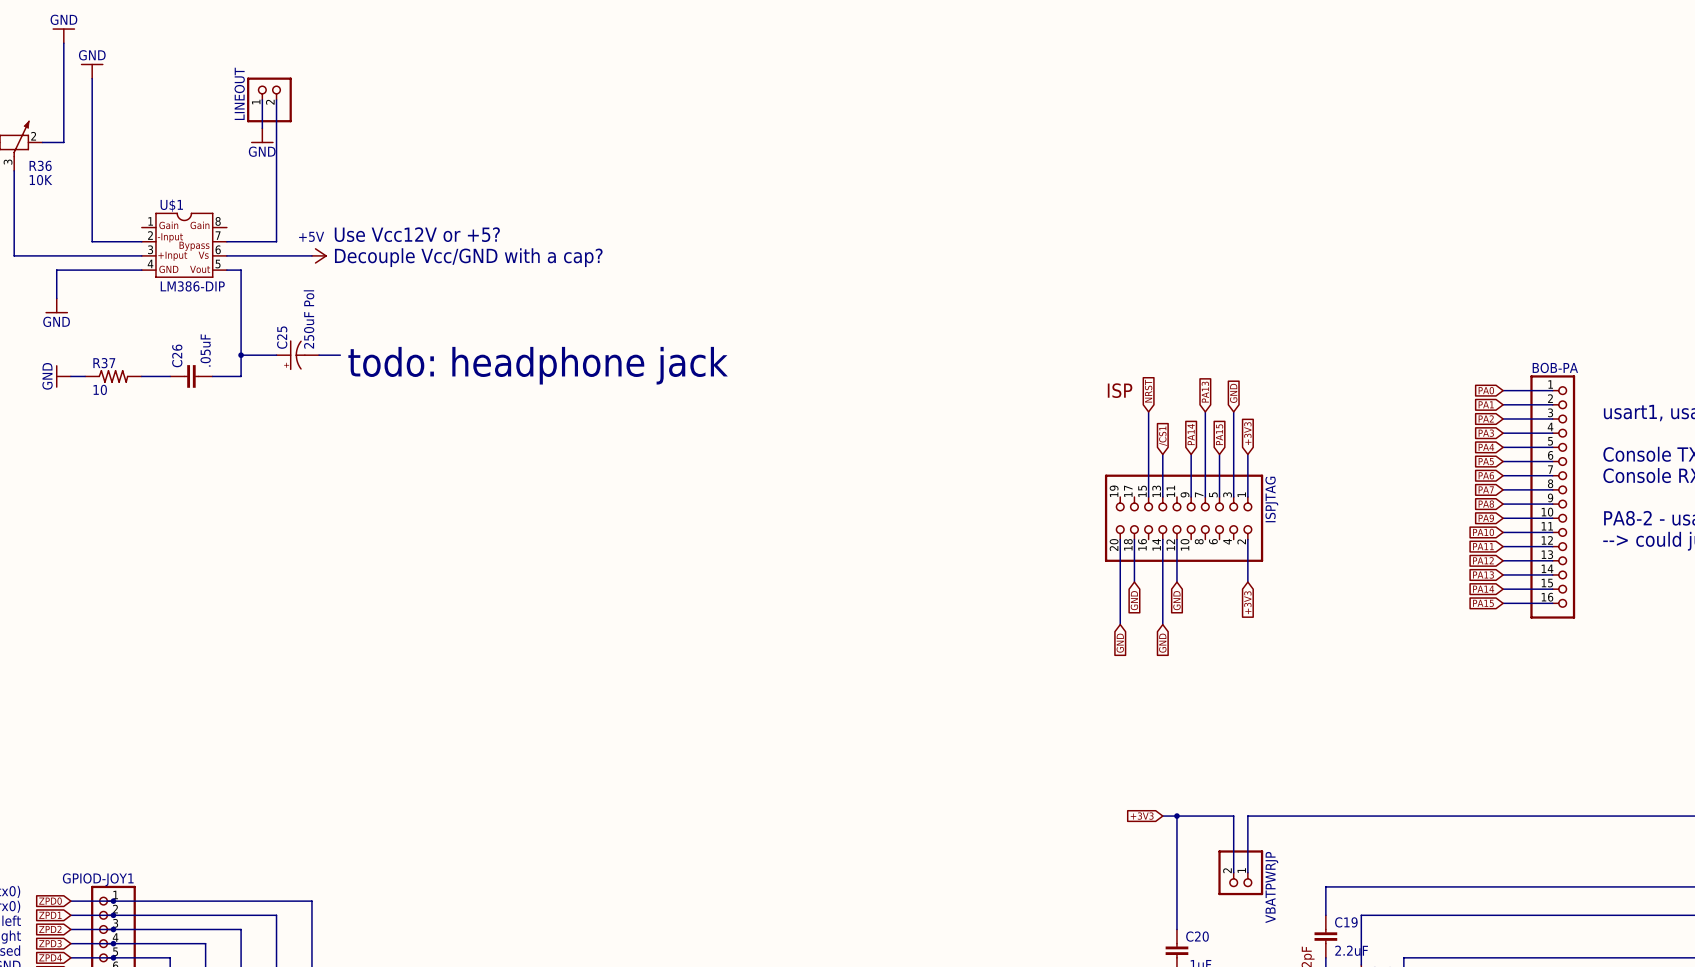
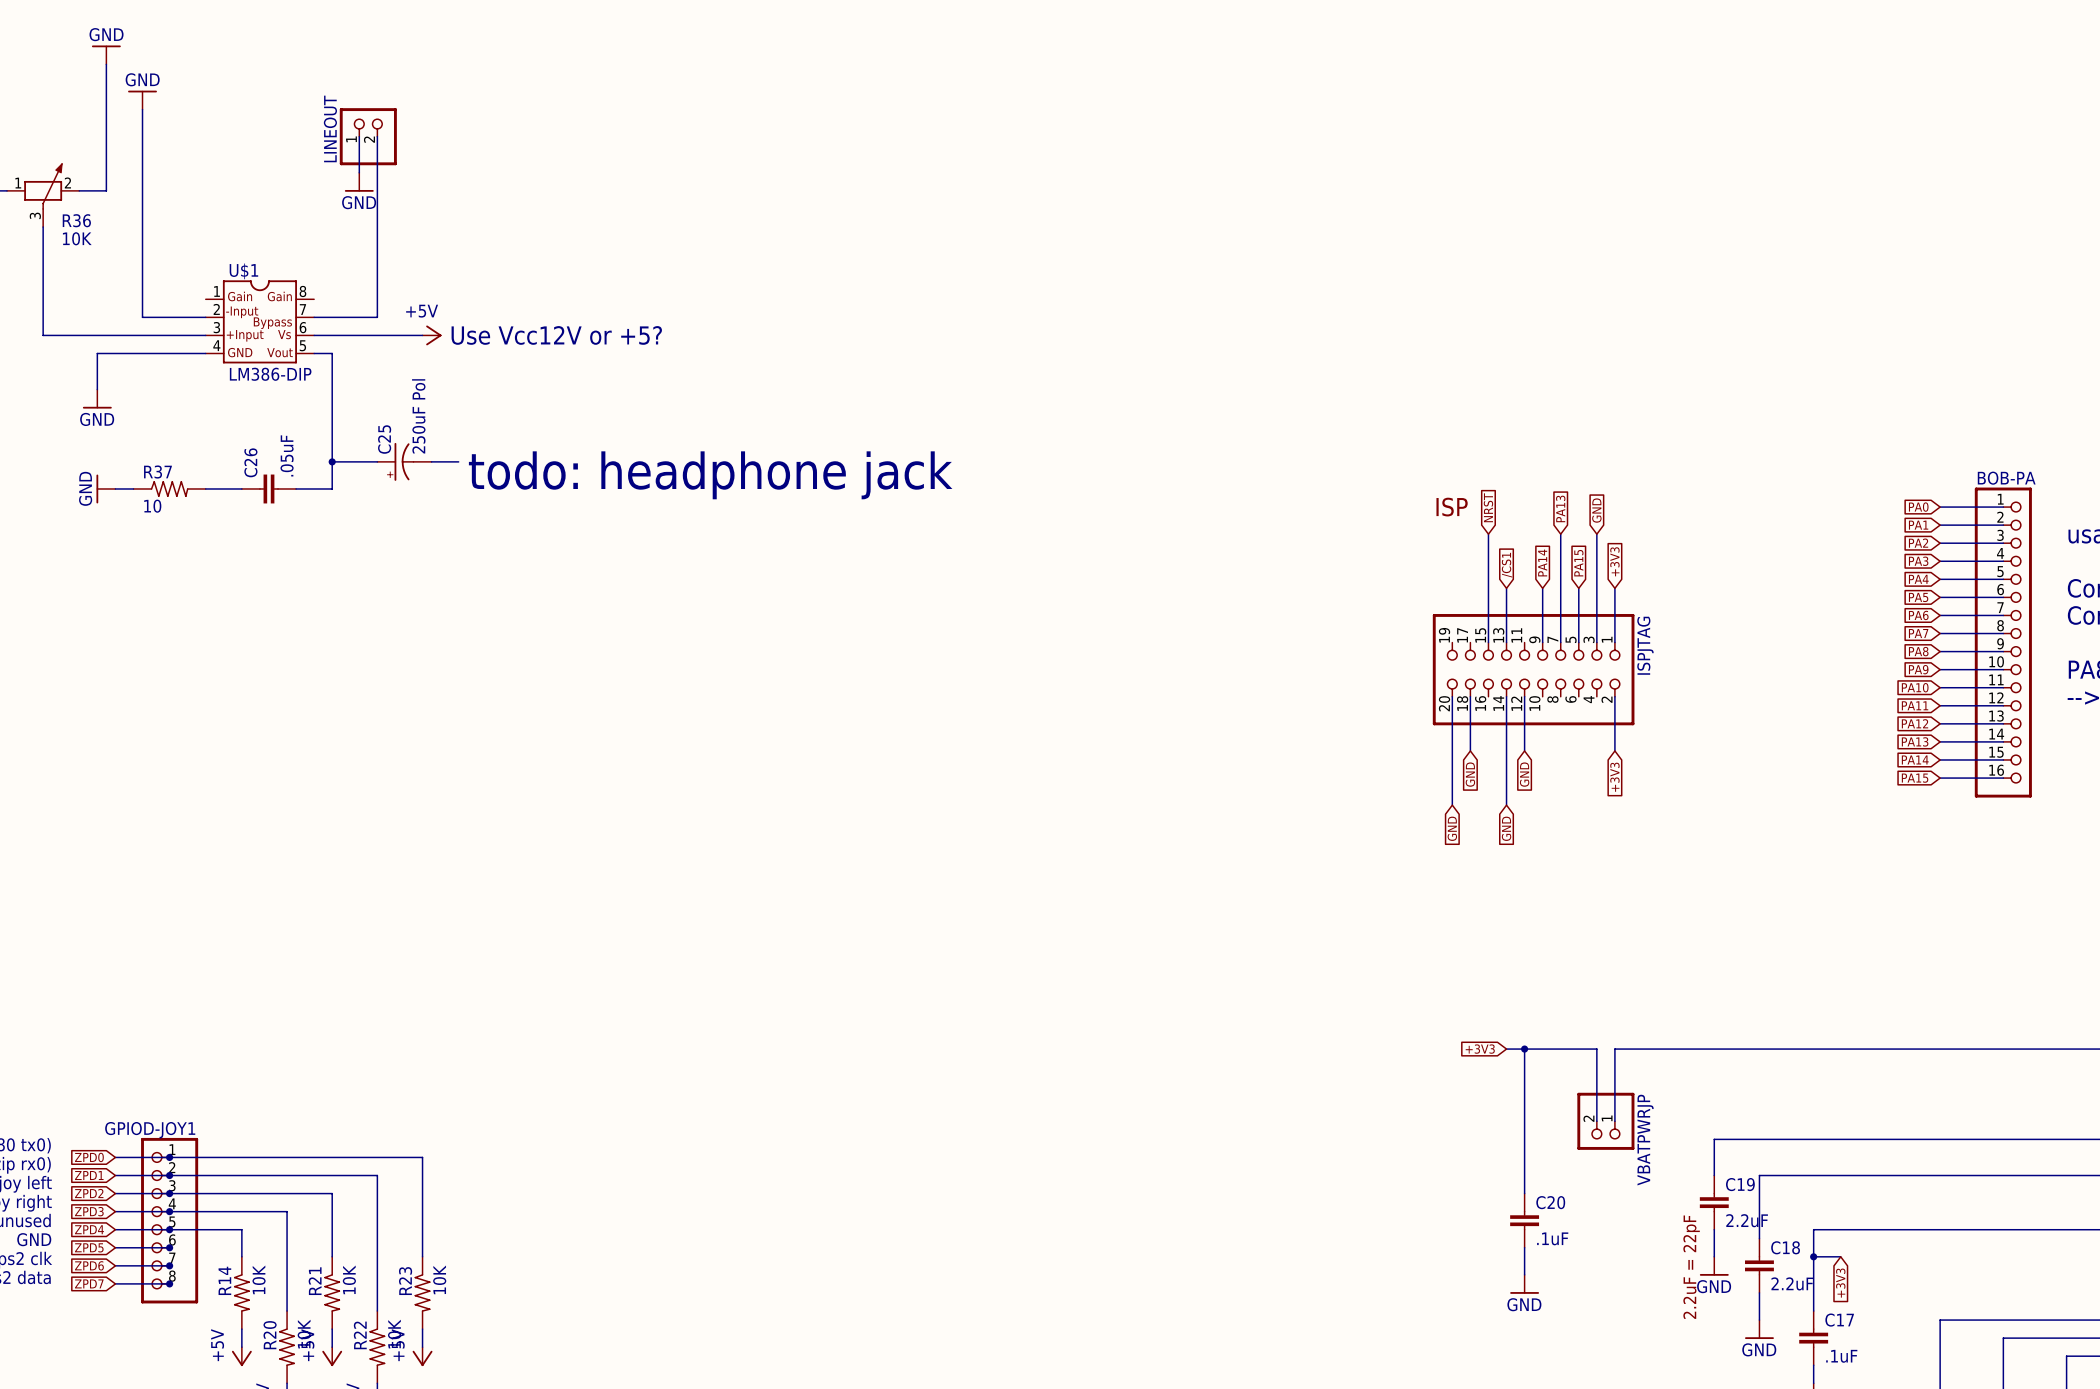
text: Use Vcc12V or +5? (417, 234) -> none
text: Decouple Vcc/GND with a cap? (468, 257) -> Use Vcc12V or +5? (556, 335)

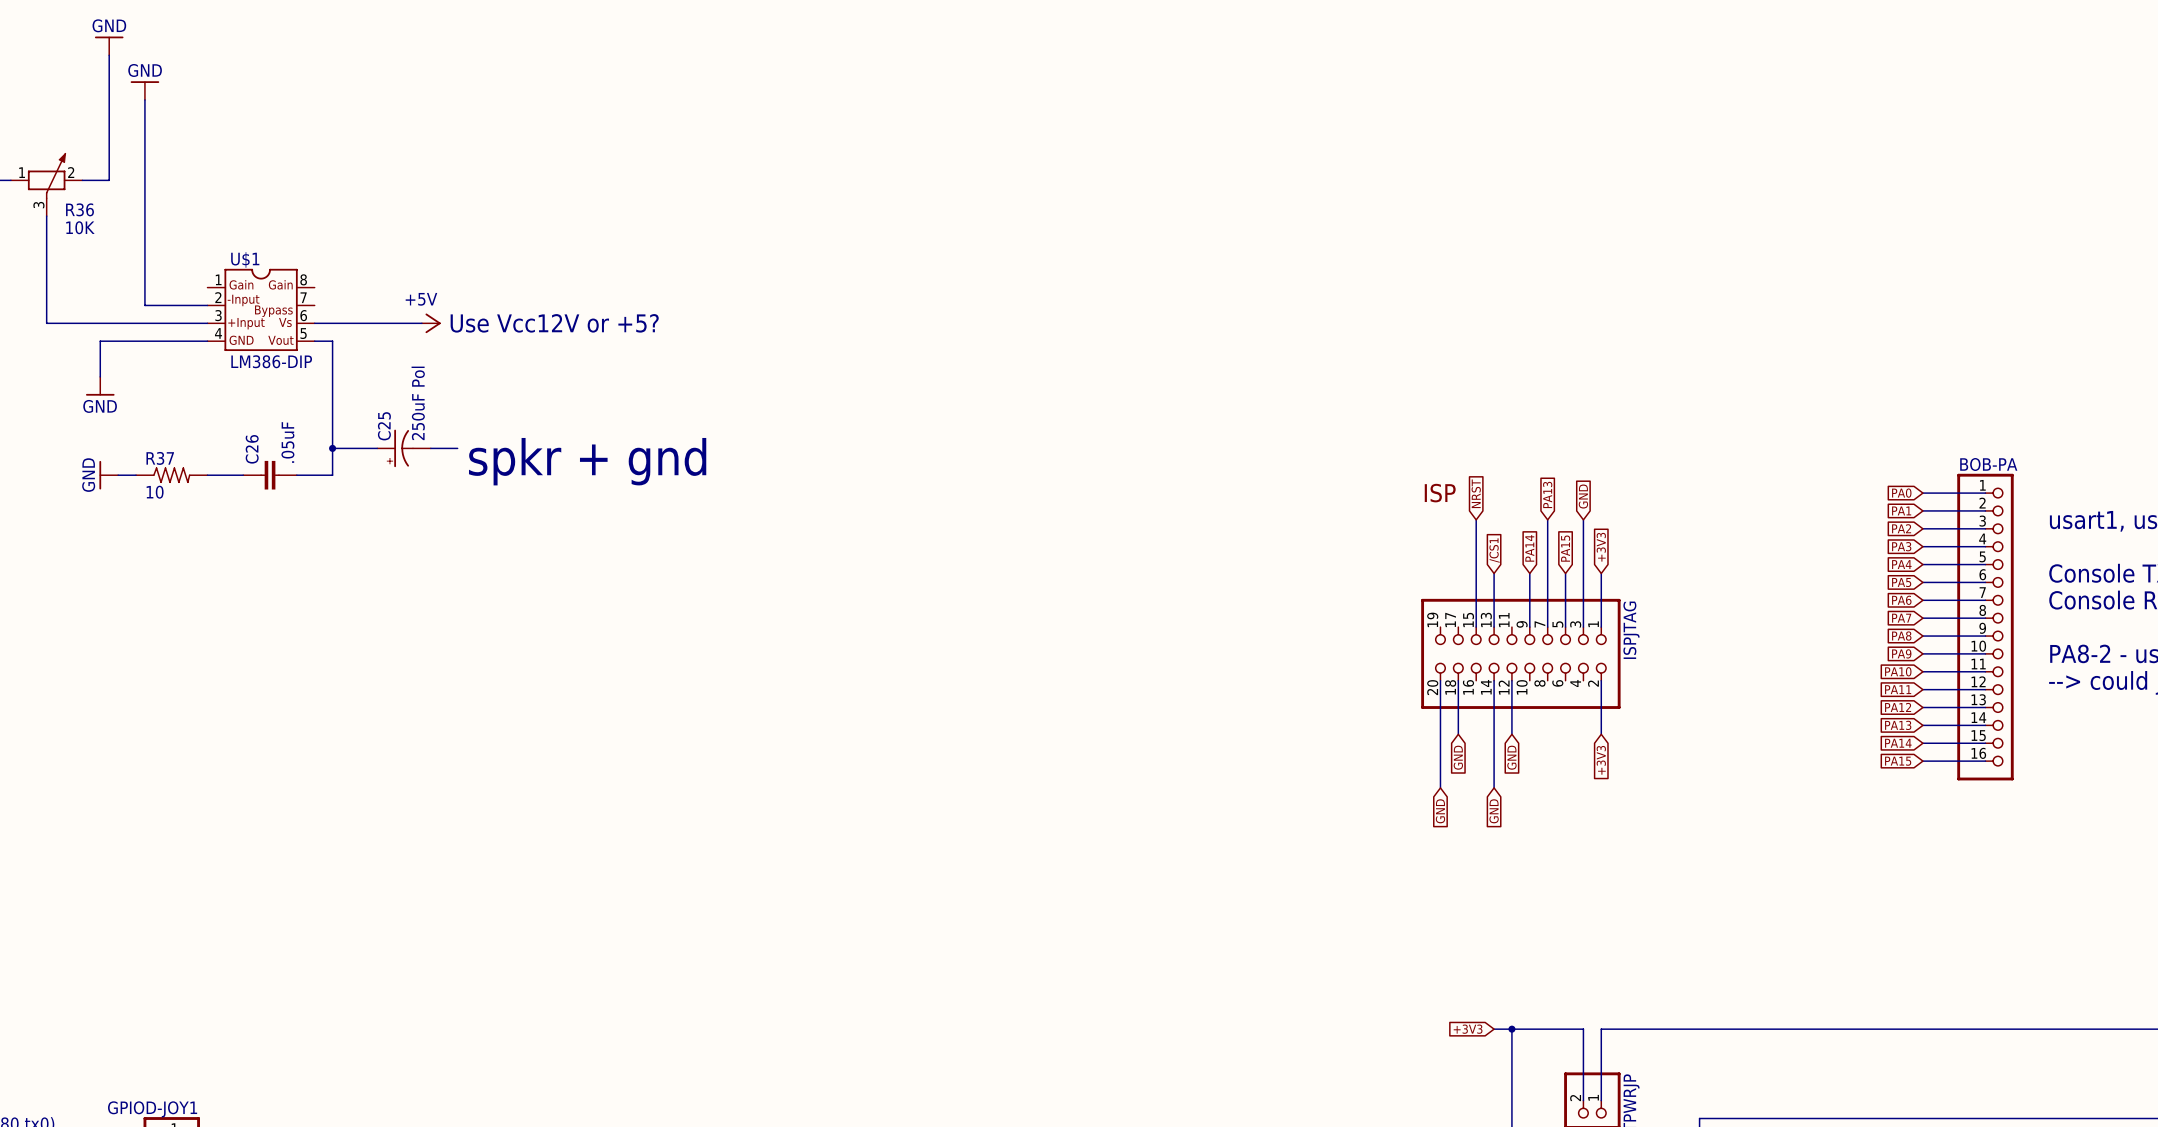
wire: (359, 136) (359, 172) -> none
LINEOUT: (368, 136) -> none
wire: (377, 136) (377, 317) (314, 317) -> none
power symbol: GND (359, 182) -> none
text: todo: headphone jack (710, 475) -> spkr + gnd (587, 461)

